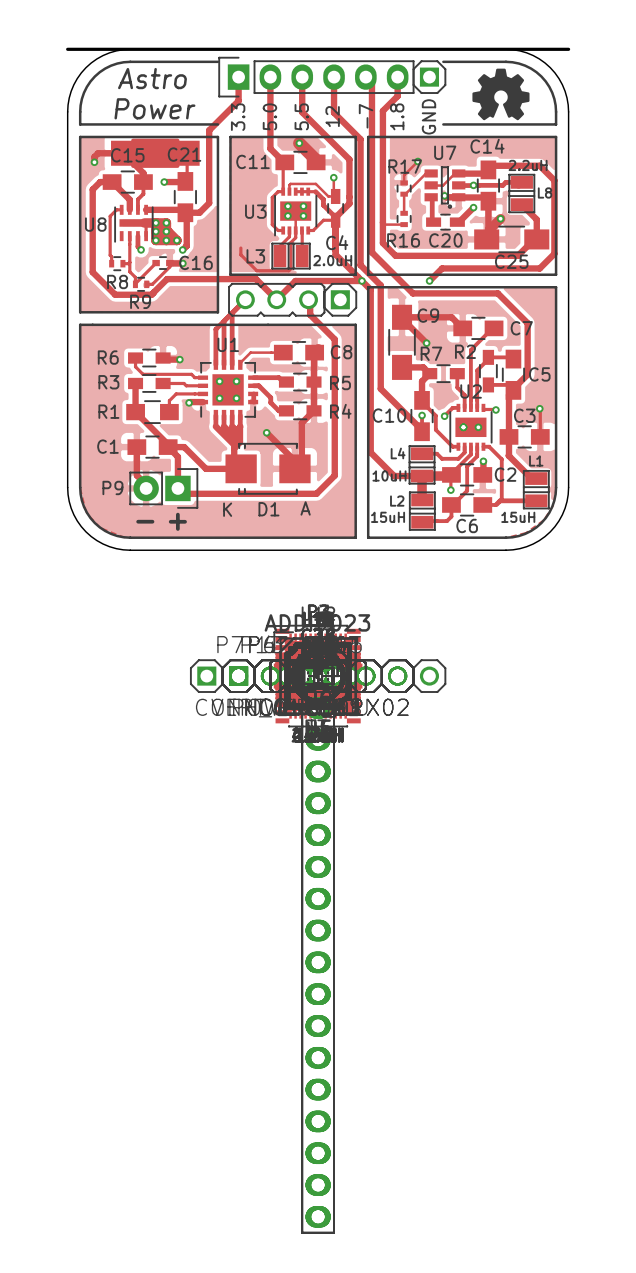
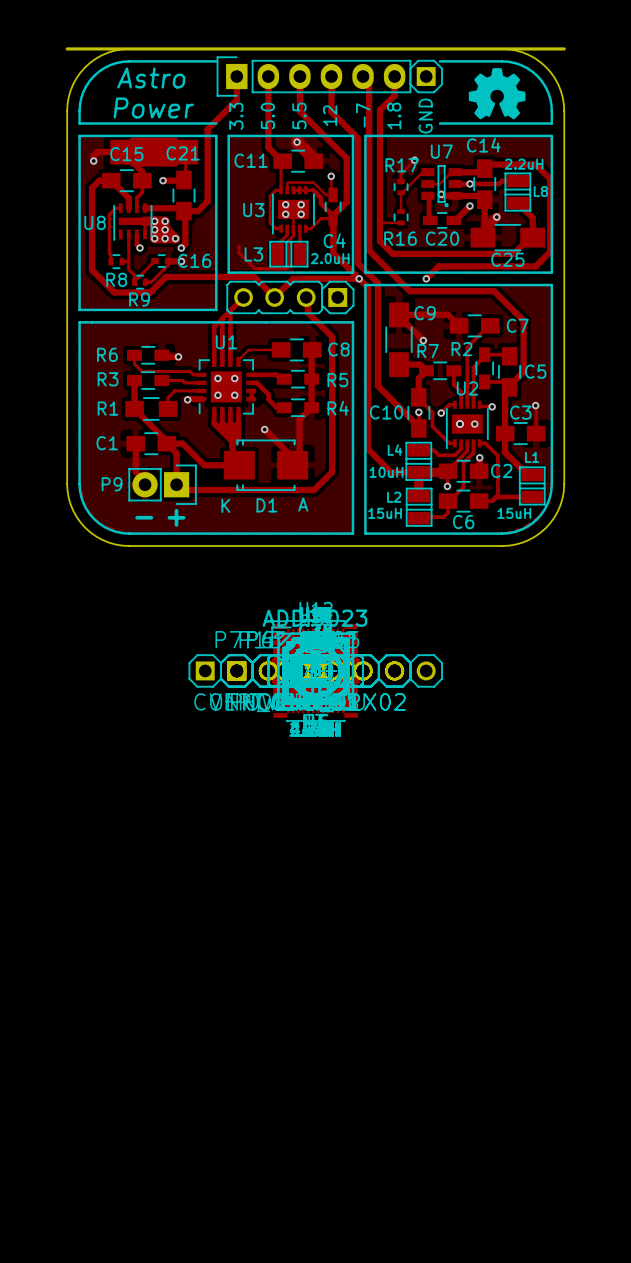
part: (318, 944) -> none
part: (318, 944) -> none

